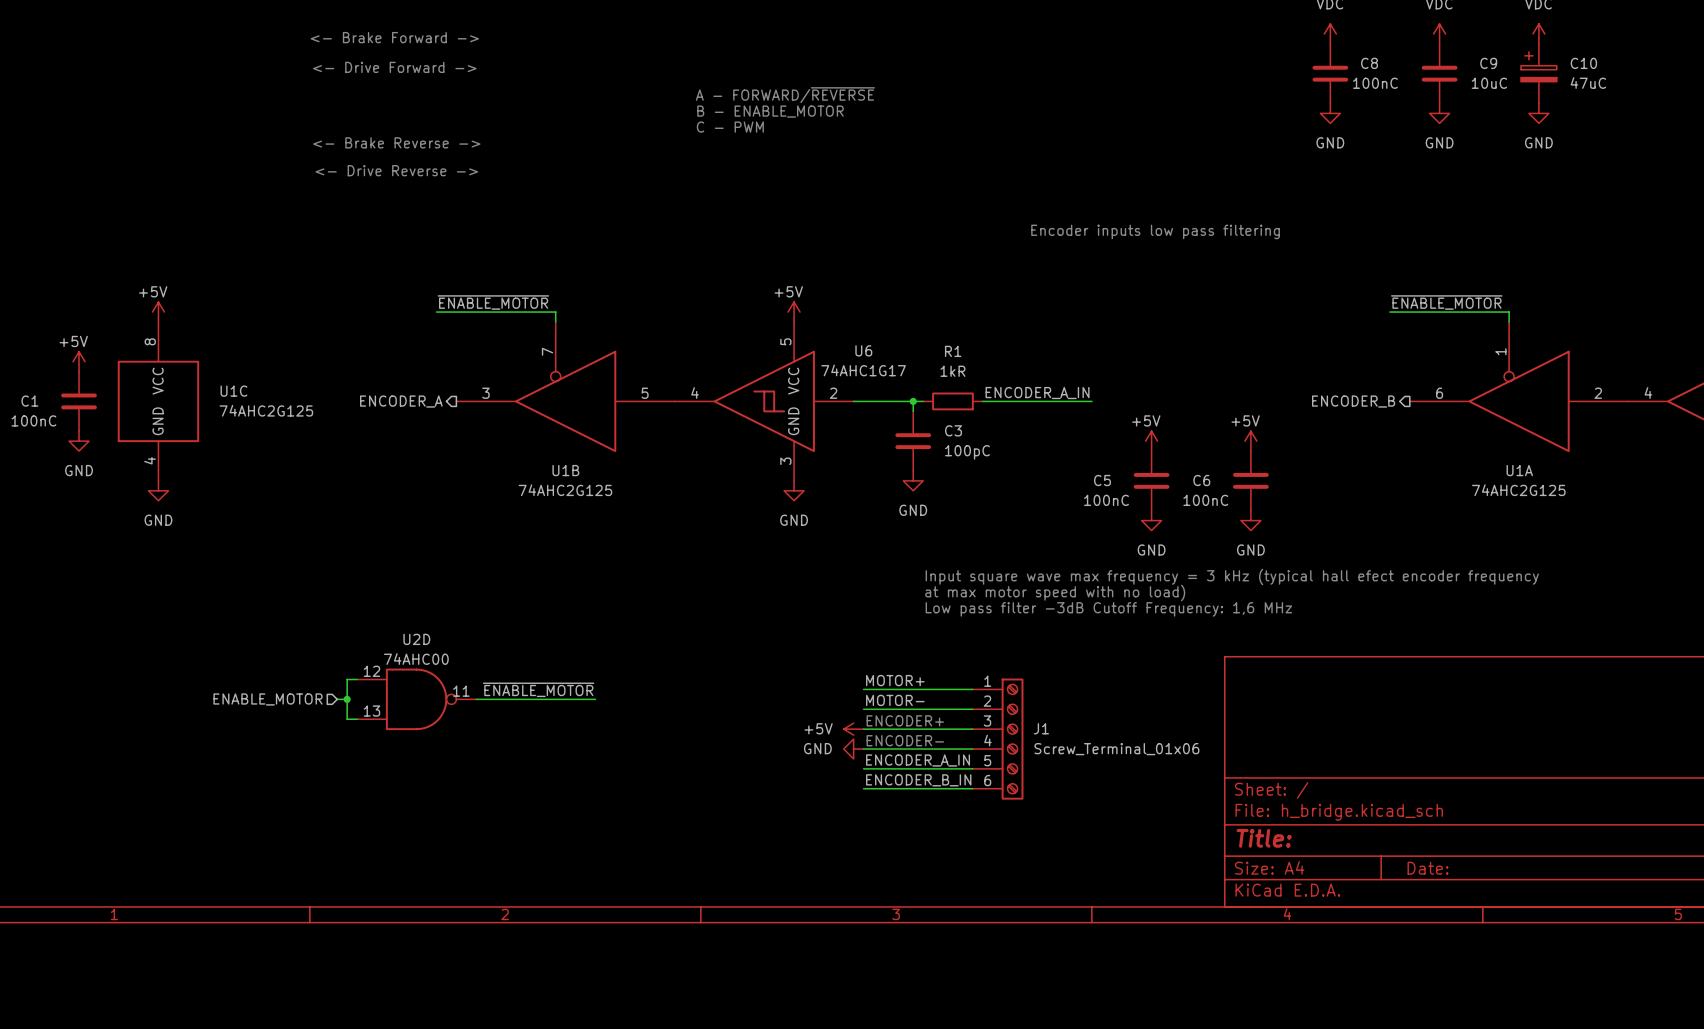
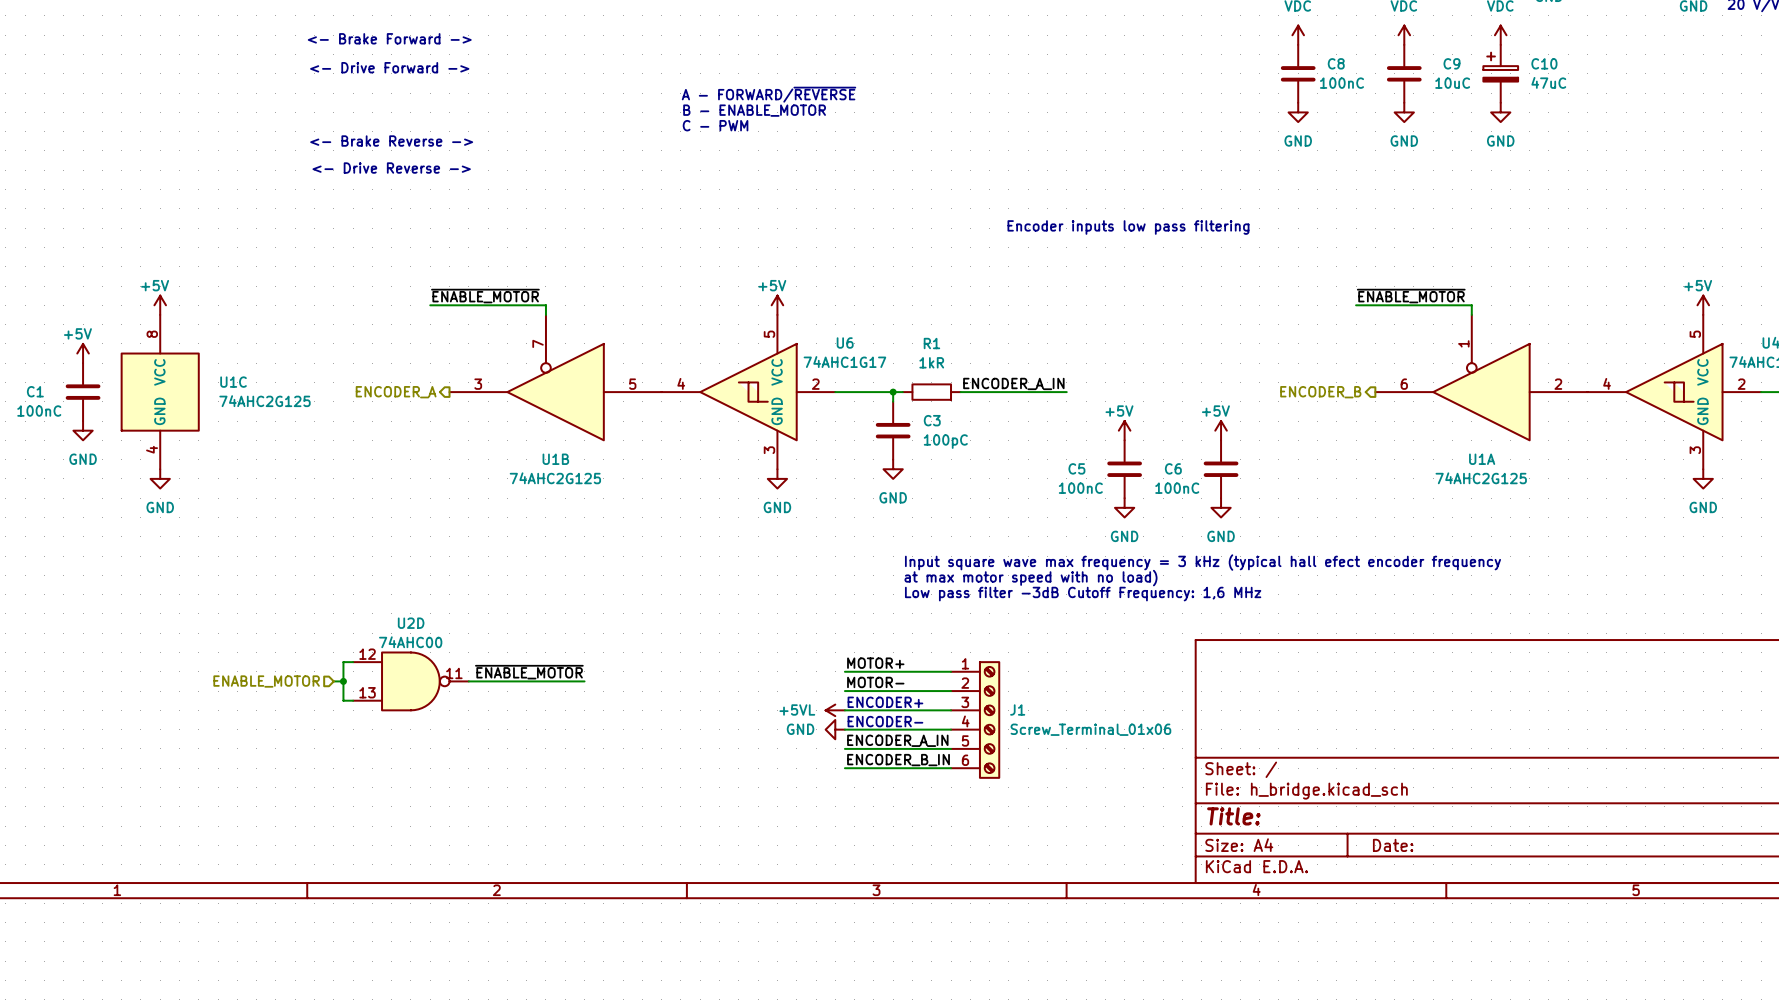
power symbol: +5V (853, 729) -> +5VL (835, 710)

